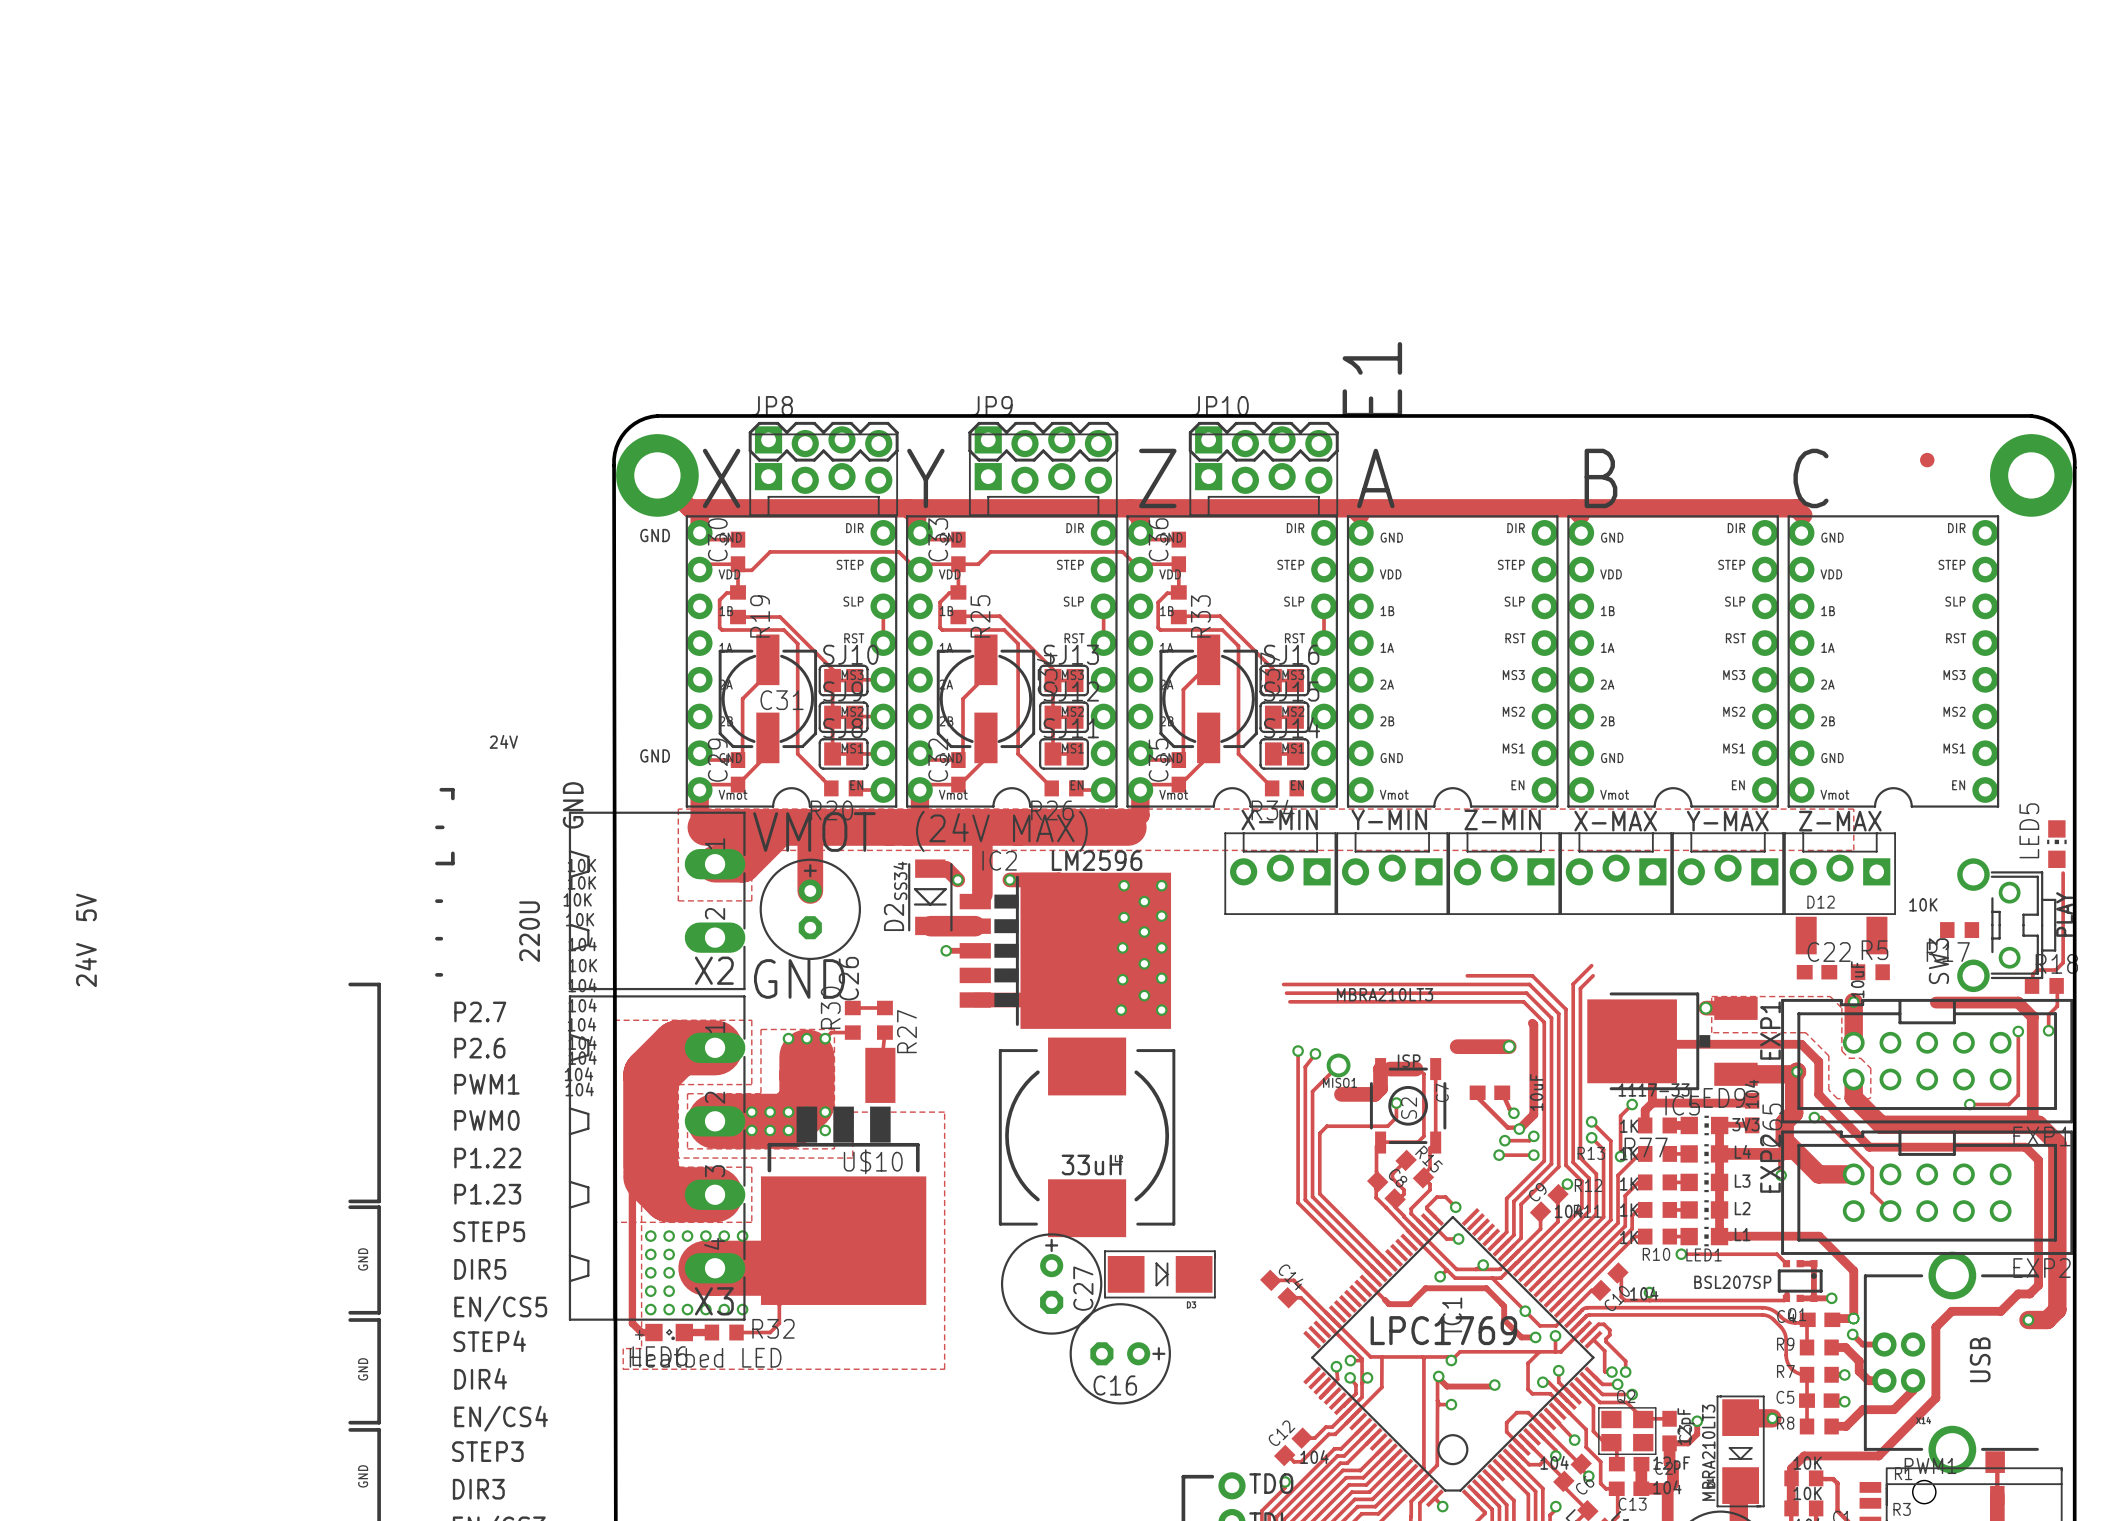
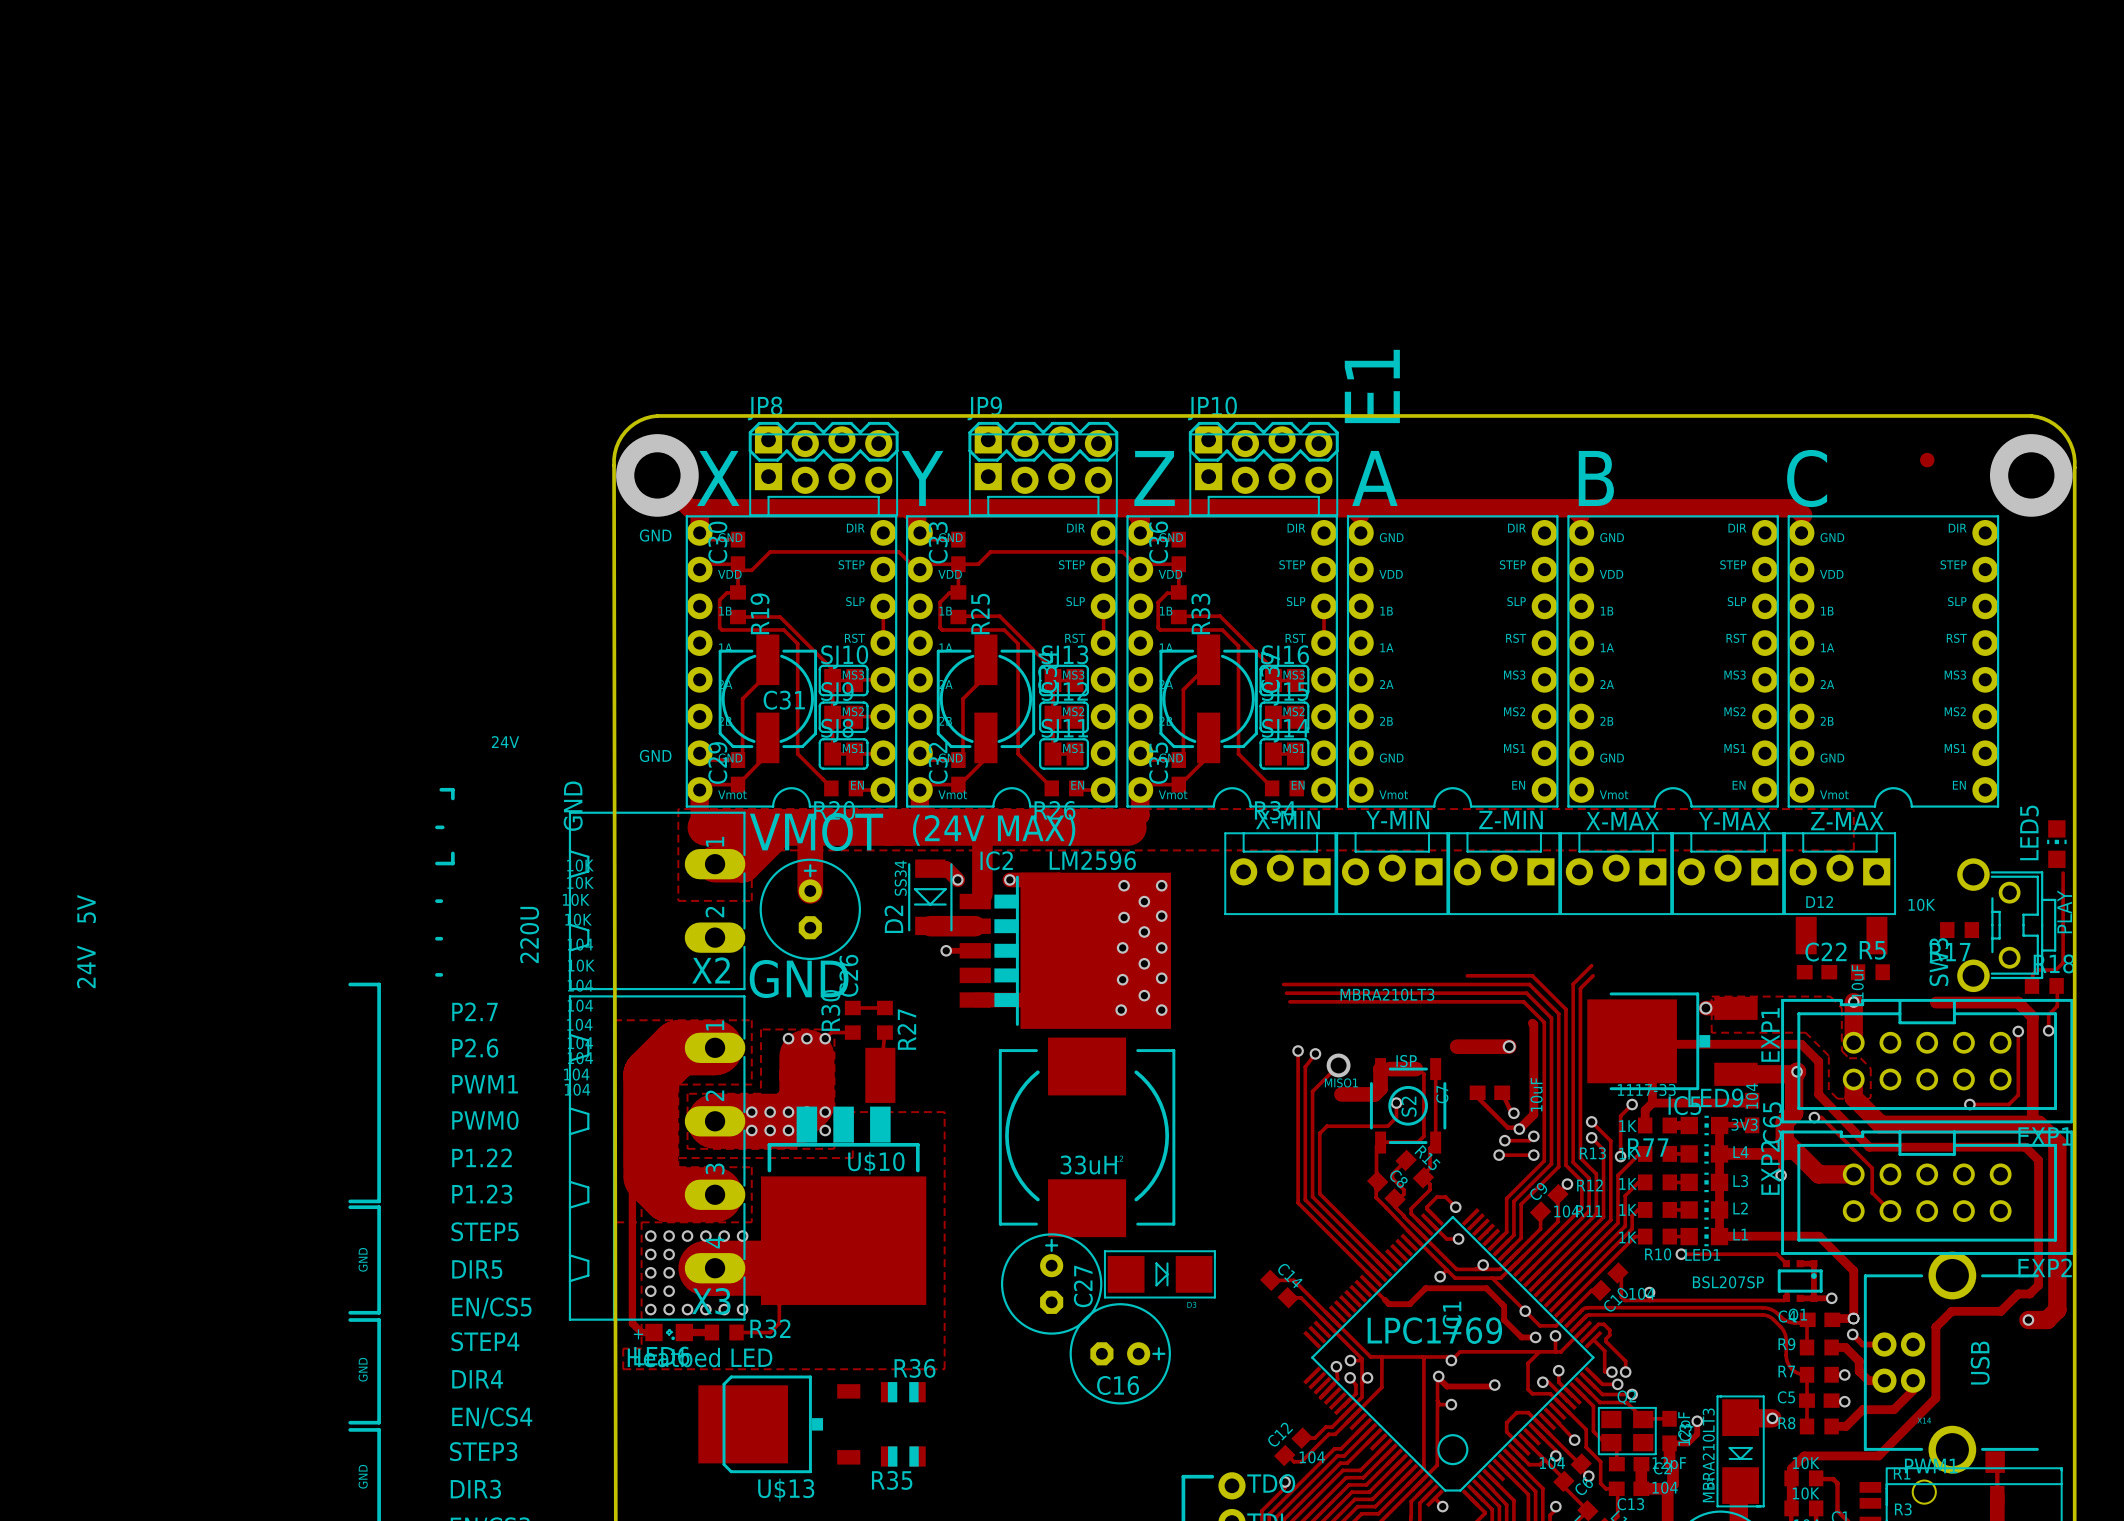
R36: none -> (903, 1392)
U$13: none -> (779, 1424)
R35: none -> (903, 1456)

